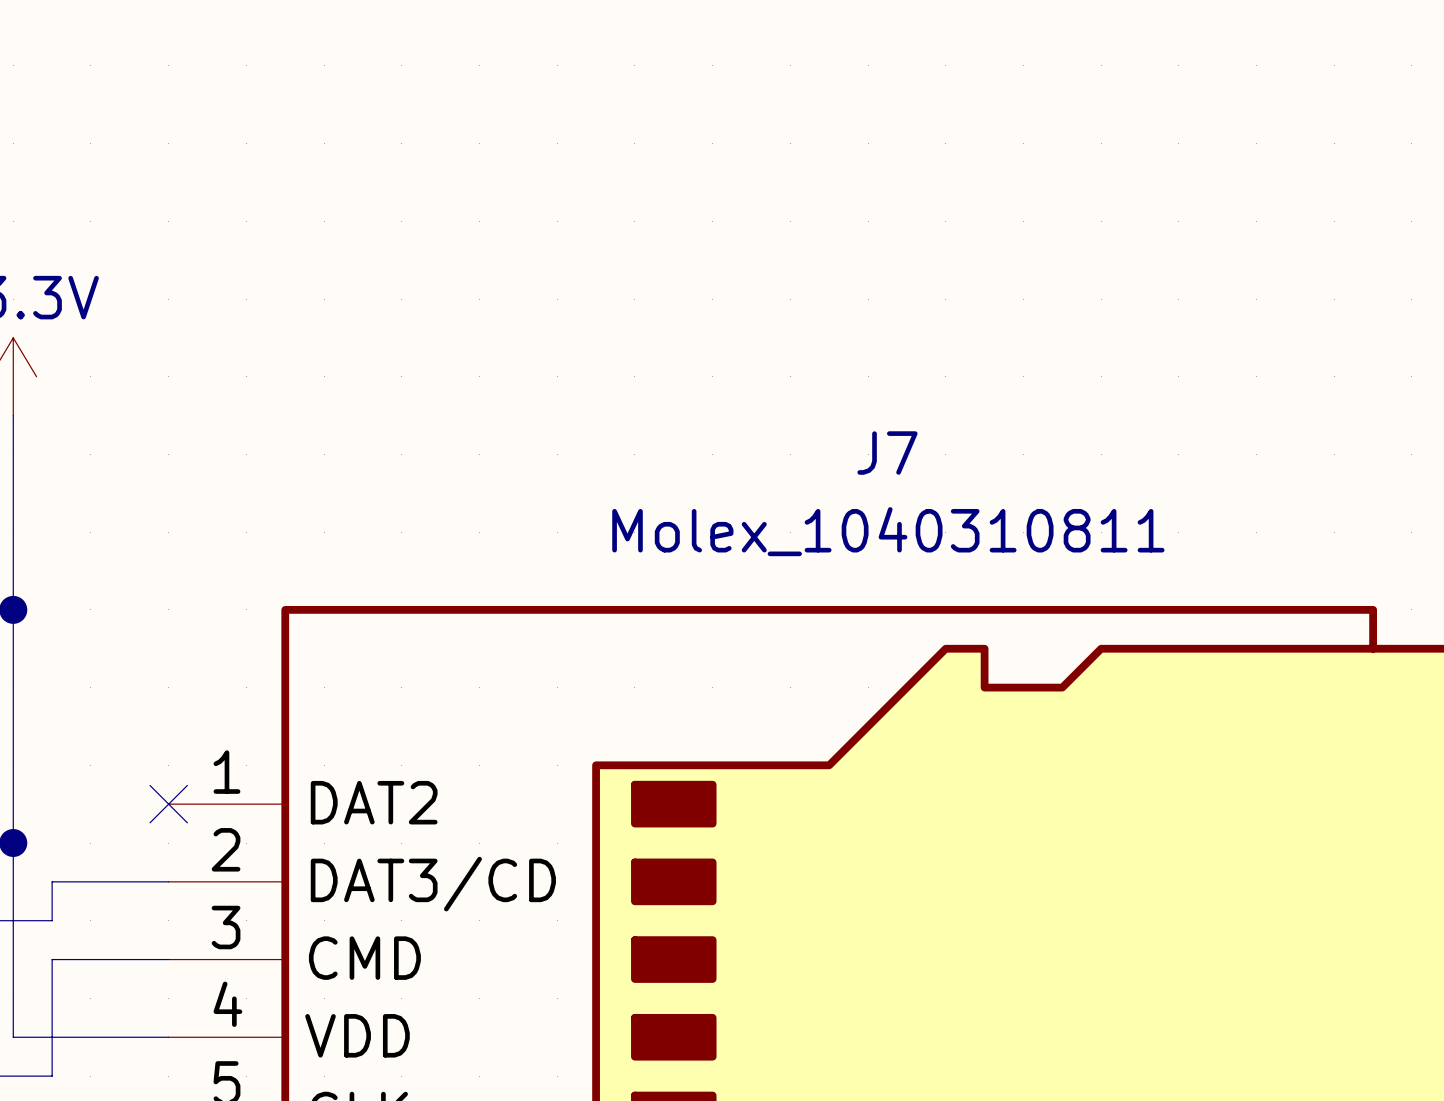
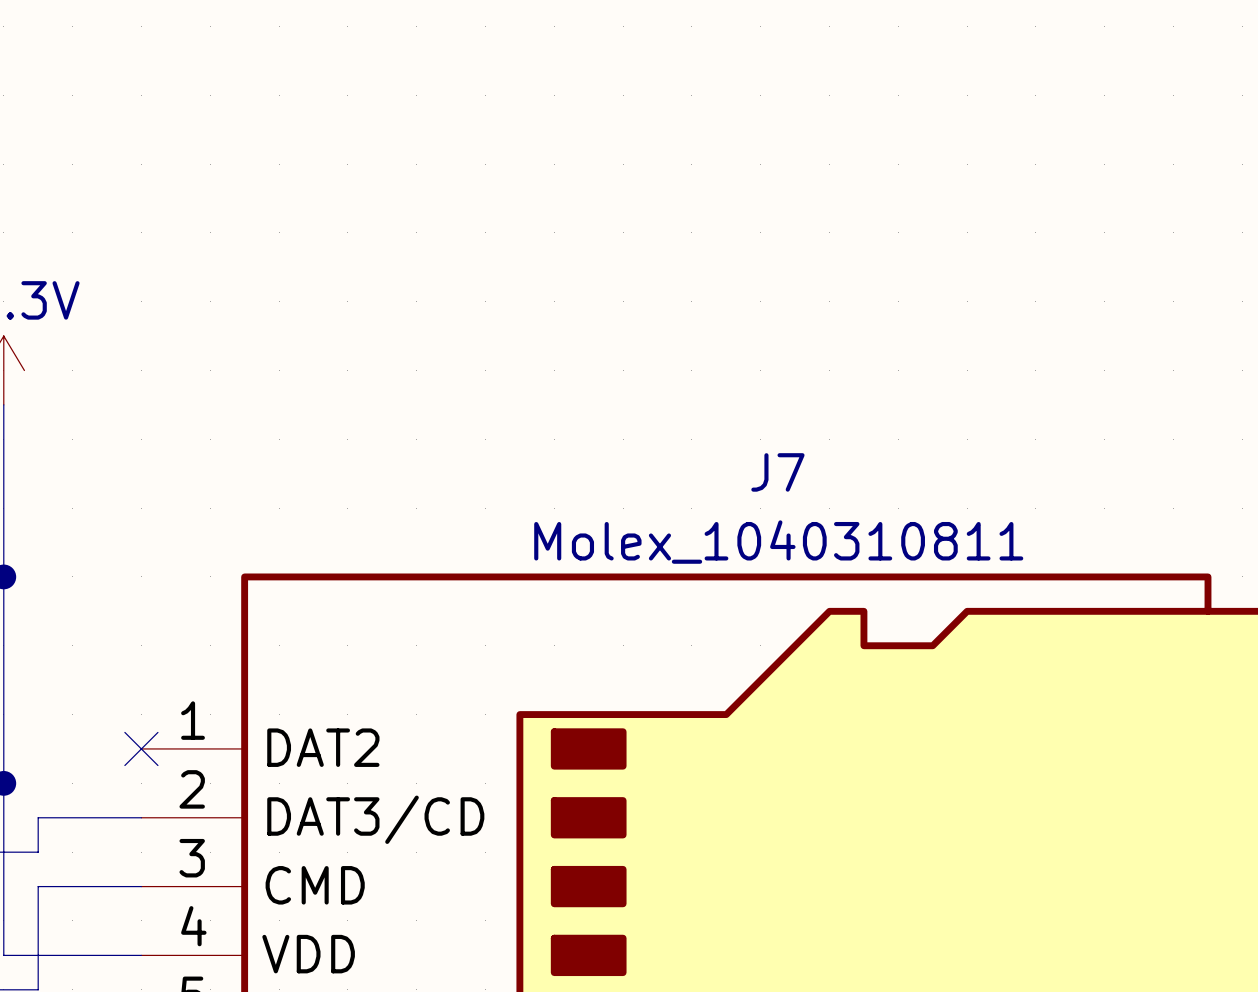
J7 name position: J7 (887, 453) -> J7 (777, 472)
J7 value position: Molex_1040310811 (888, 531) -> Molex_1040310811 (778, 542)

